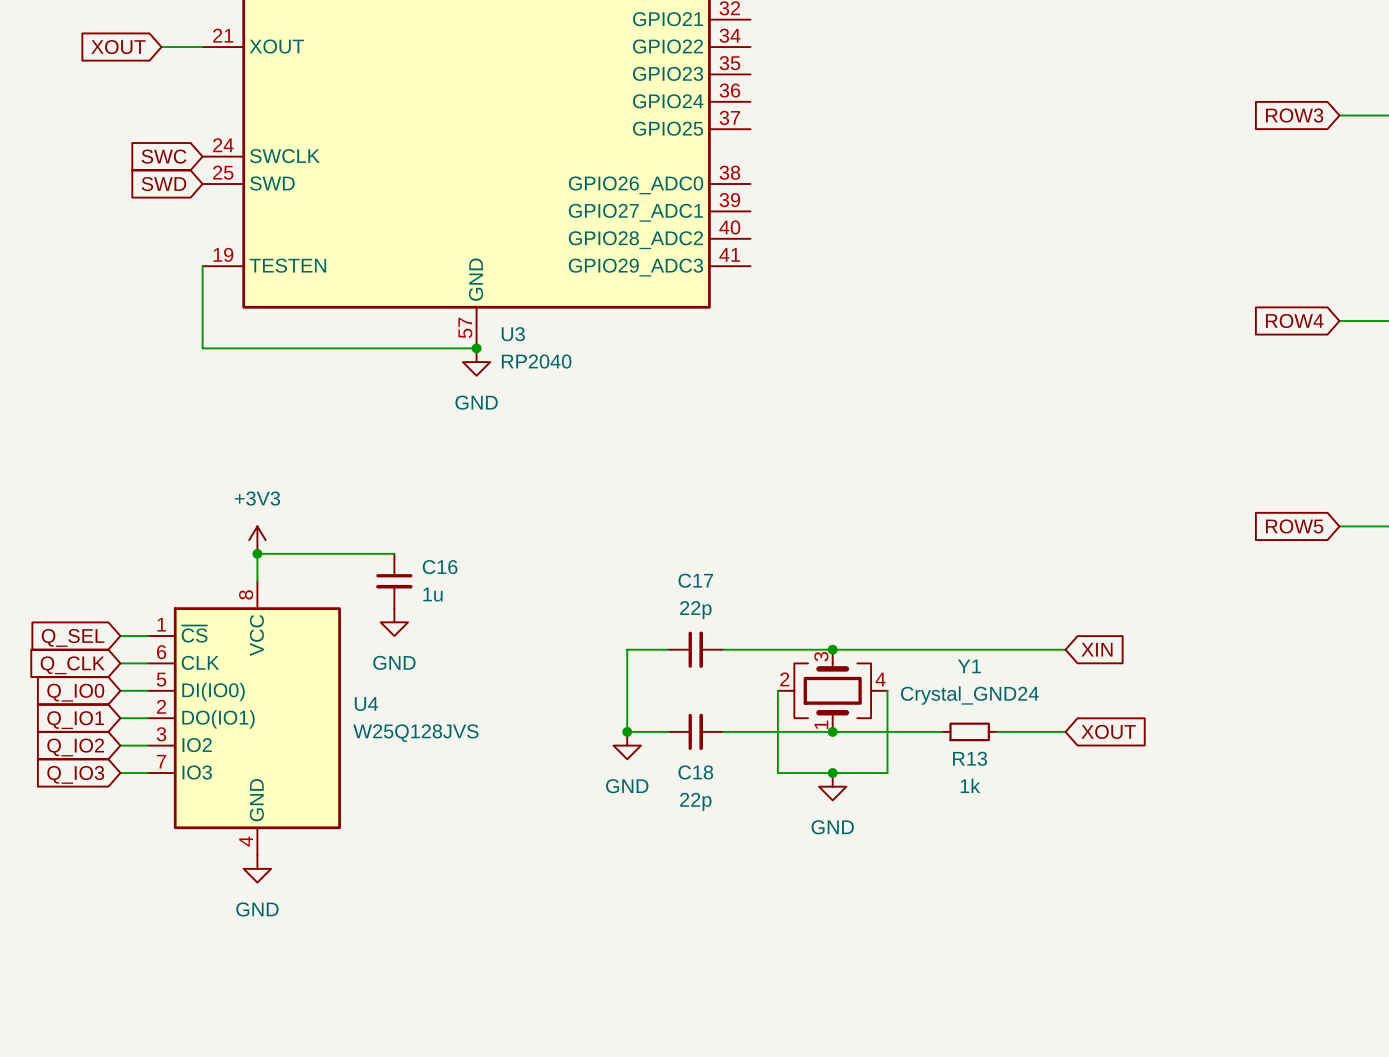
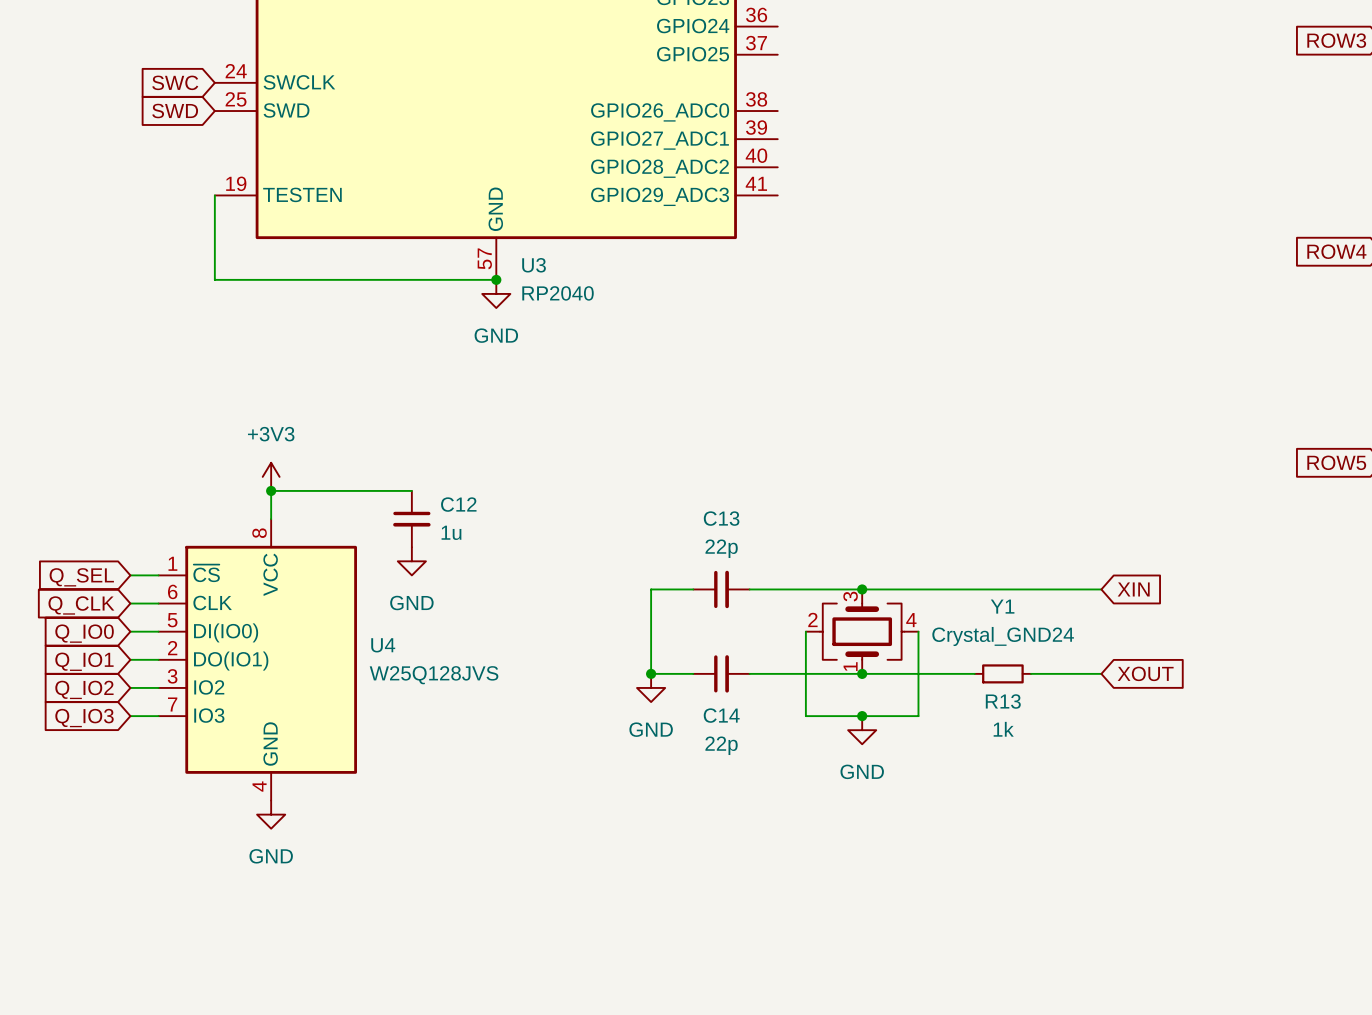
C16 name: C16 (440, 567) -> C12 (458, 504)
C17 name: C17 (695, 580) -> C13 (721, 518)
C18 name: C18 (695, 772) -> C14 (721, 715)

